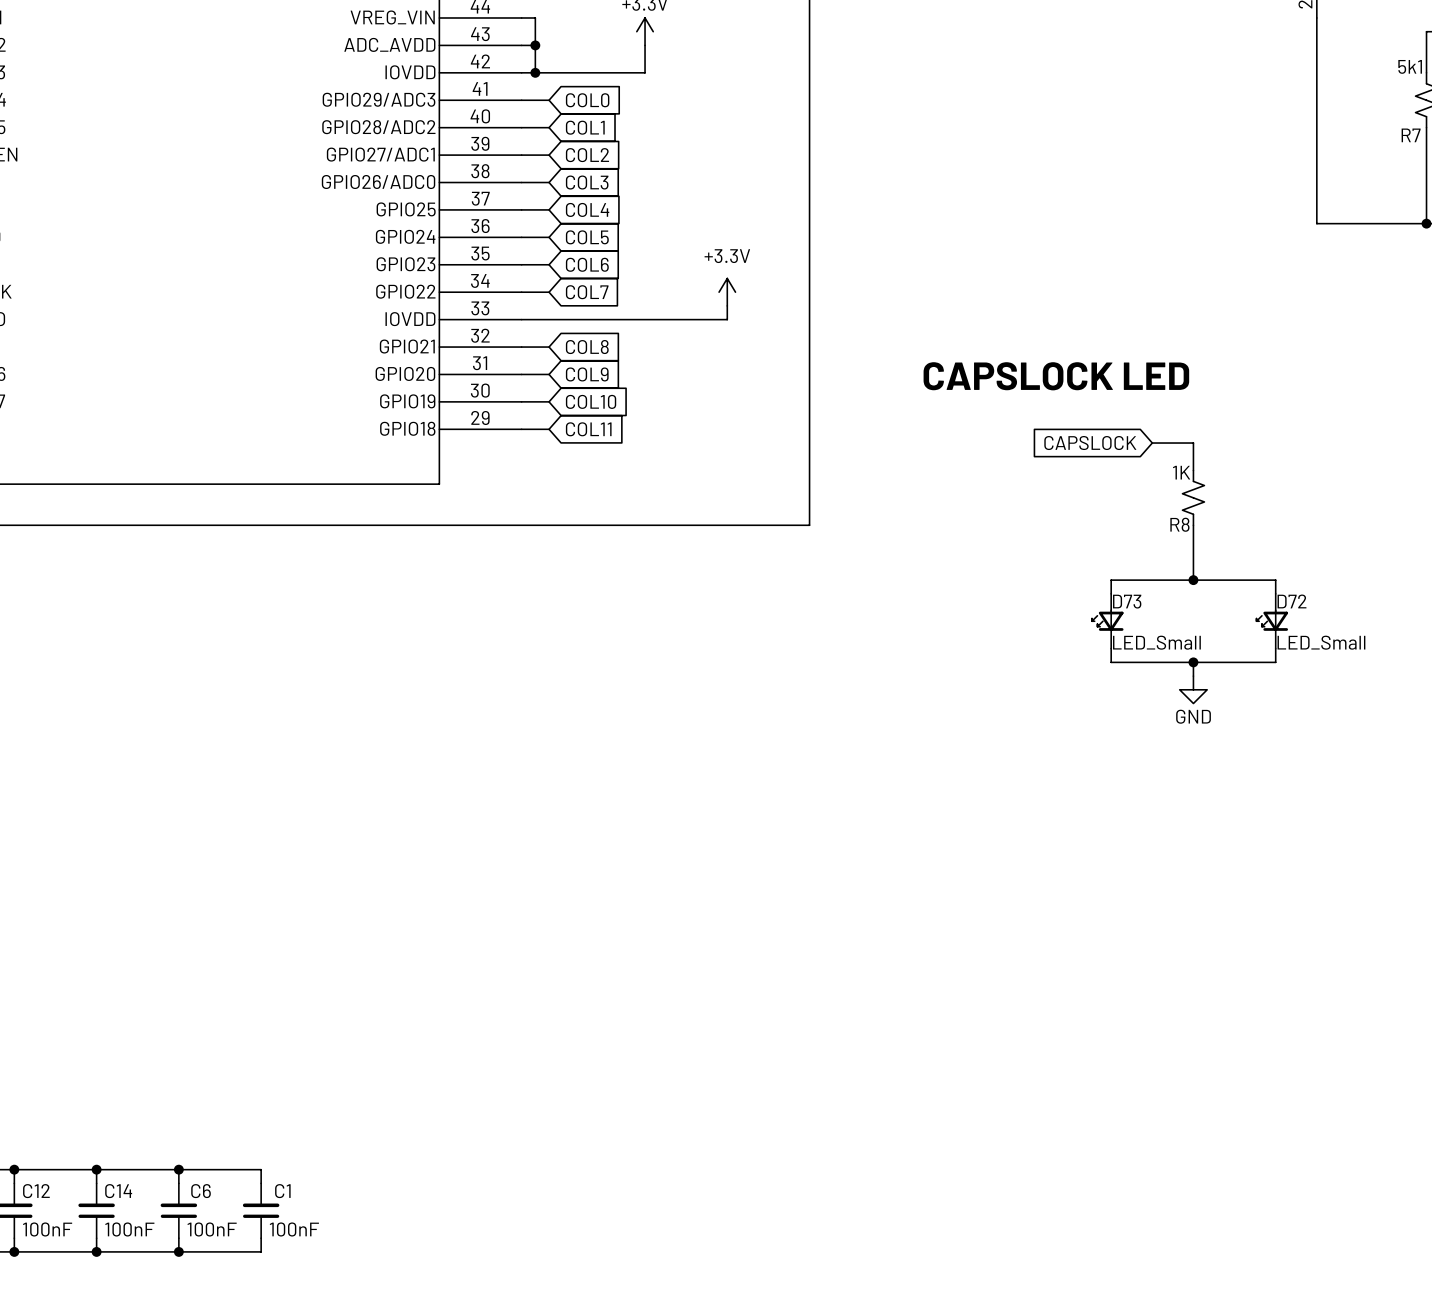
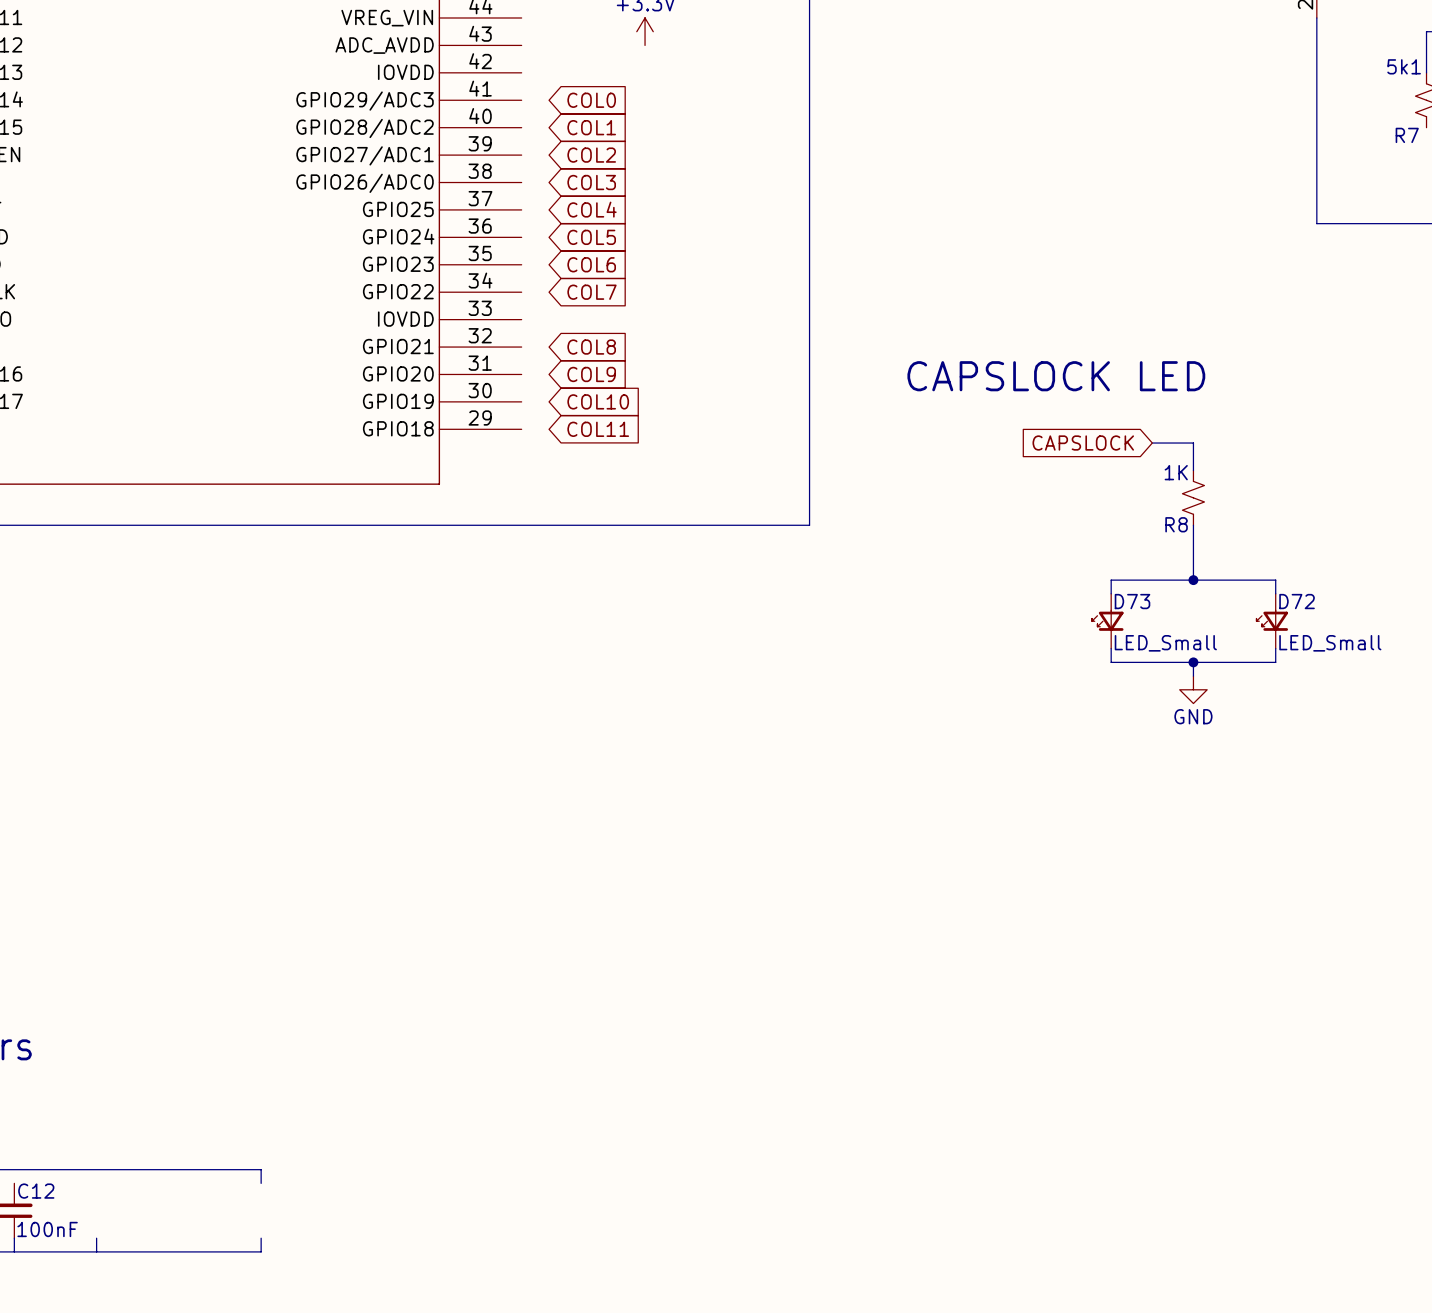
wire: (521, 17) (535, 17) (535, 72) -> none
wire: (521, 45) (535, 45) -> none
junction: (535, 45) -> none
wire: (645, 45) (645, 72) (521, 72) -> none
junction: (535, 72) -> none
wire: (521, 100) (549, 100) -> none
wire: (521, 127) (549, 127) -> none
wire: (1426, 127) (1426, 223) -> none
wire: (521, 155) (549, 155) -> none
wire: (521, 182) (549, 182) -> none
wire: (521, 209) (549, 209) -> none
junction: (1426, 223) -> none
wire: (521, 237) (549, 237) -> none
wire: (521, 264) (549, 264) -> none
wire: (521, 292) (549, 292) -> none
power symbol: +3.3V (727, 292) -> none
wire: (727, 305) (727, 319) (521, 319) -> none
wire: (521, 347) (549, 347) -> none
wire: (521, 374) (549, 374) -> none
wire: (521, 401) (549, 401) -> none
wire: (521, 429) (549, 429) -> none
wire: (14, 1169) (14, 1183) -> none
junction: (14, 1169) -> none
wire: (96, 1169) (96, 1183) -> none
junction: (96, 1169) -> none
wire: (178, 1169) (178, 1183) -> none
junction: (178, 1169) -> none
C14: 100nF (96, 1210) -> none
C6: 100nF (178, 1210) -> none
C1: 100nF (261, 1210) -> none
wire: (178, 1238) (178, 1251) -> none
junction: (14, 1251) -> none
junction: (96, 1251) -> none
junction: (178, 1251) -> none

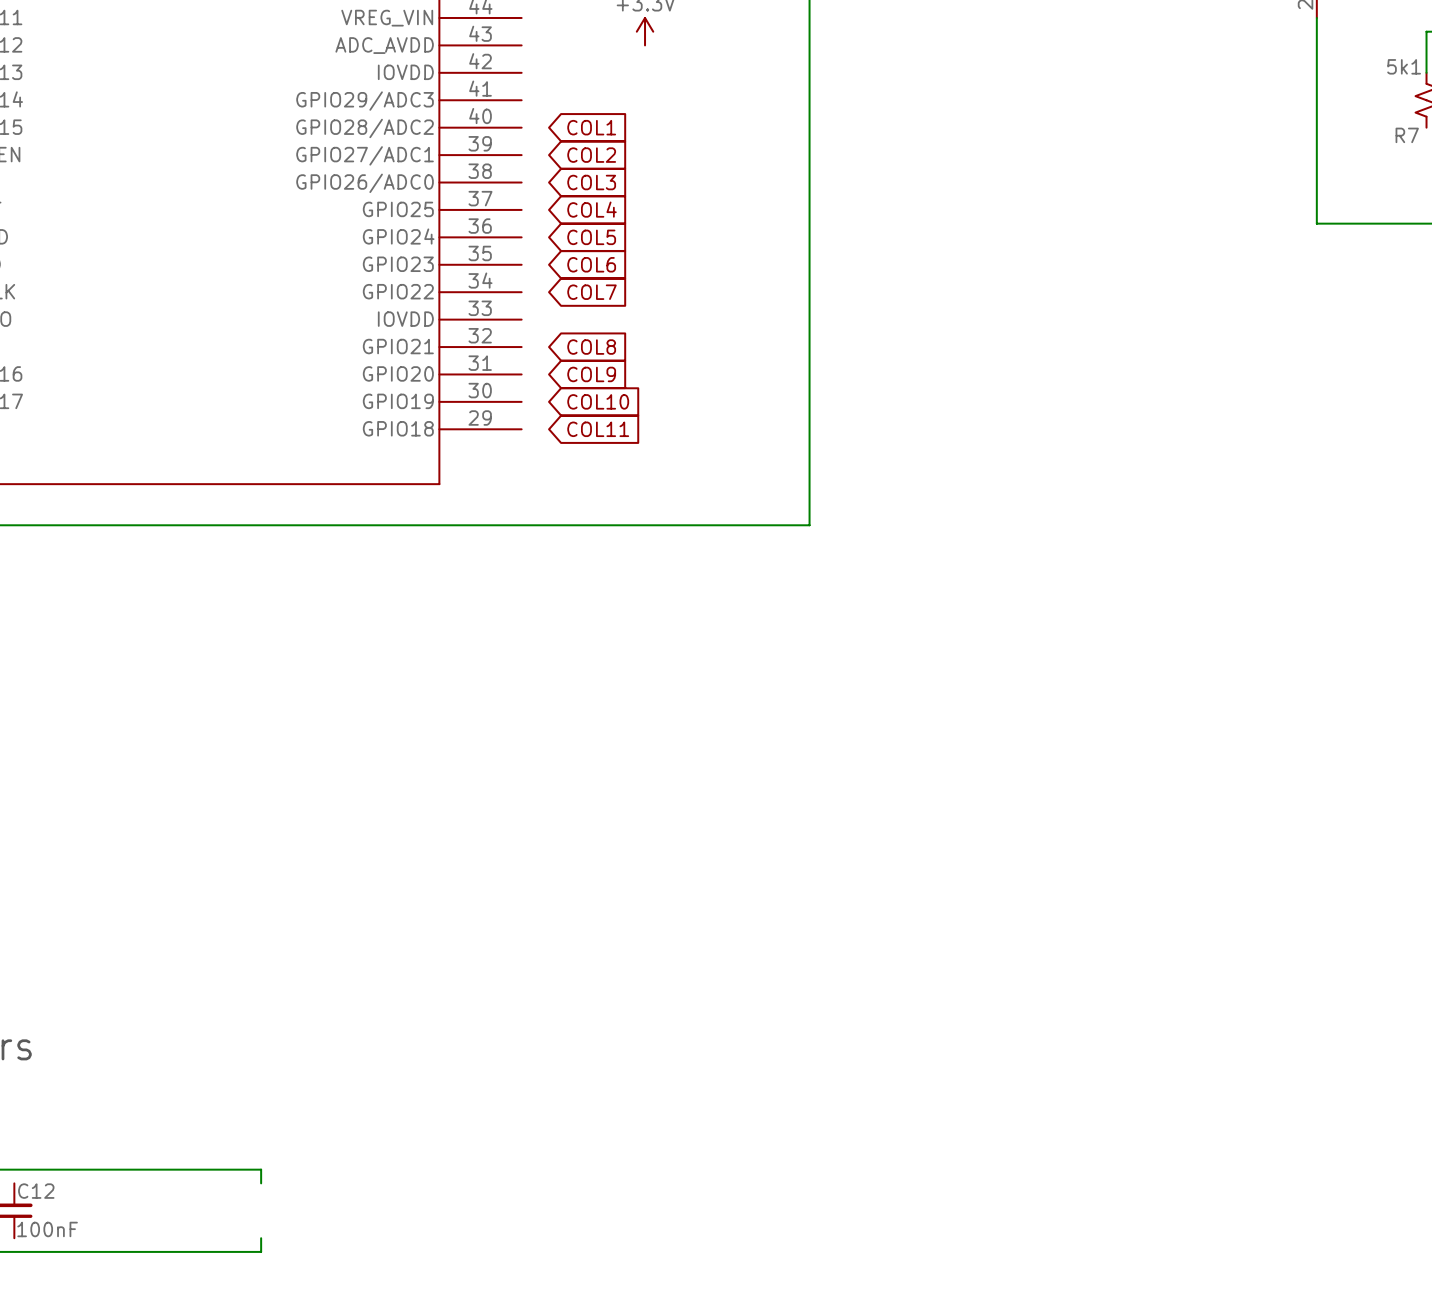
global label: COL0 (591, 100) -> none
text: CAPSLOCK LED (1056, 376) -> none
global label: CAPSLOCK (1083, 443) -> none
wire: (1152, 443) (1193, 443) (1193, 470) -> none
R8: 1K (1193, 497) -> none
wire: (1193, 525) (1193, 580) -> none
junction: (1193, 580) -> none
wire: (1111, 593) (1111, 580) (1275, 580) (1275, 593) -> none
D73: LED_Small (1107, 621) -> none
D72: LED_Small (1272, 621) -> none
wire: (1111, 648) (1111, 662) (1275, 662) (1275, 648) -> none
wire: (1193, 662) (1193, 676) -> none
junction: (1193, 662) -> none
power symbol: GND (1193, 689) -> none
wire: (14, 1238) (14, 1251) -> none
wire: (96, 1238) (96, 1251) -> none

